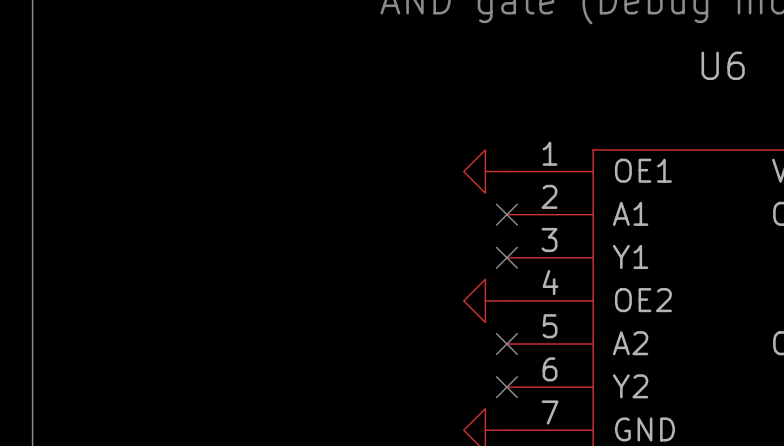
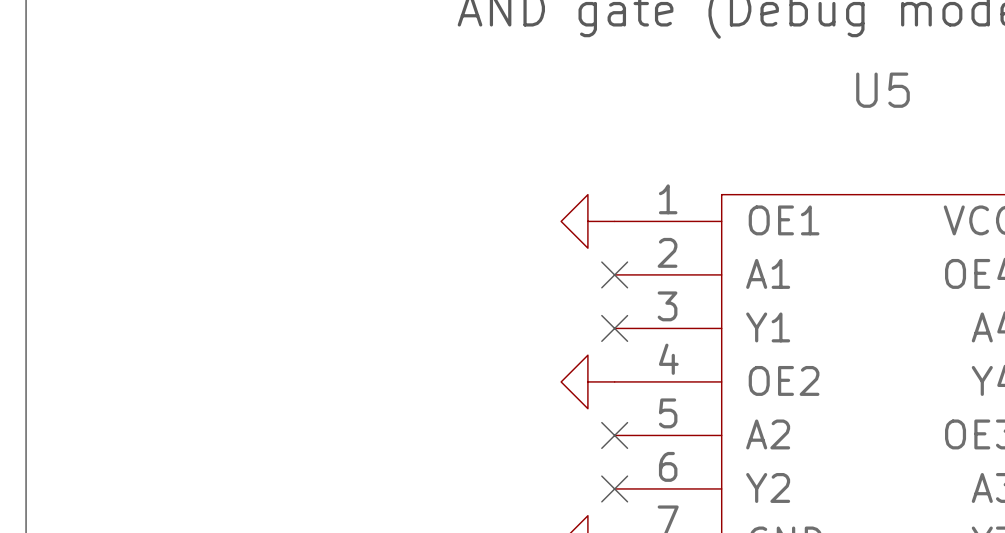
U6 name: U6 (723, 65) -> U5 (882, 90)

